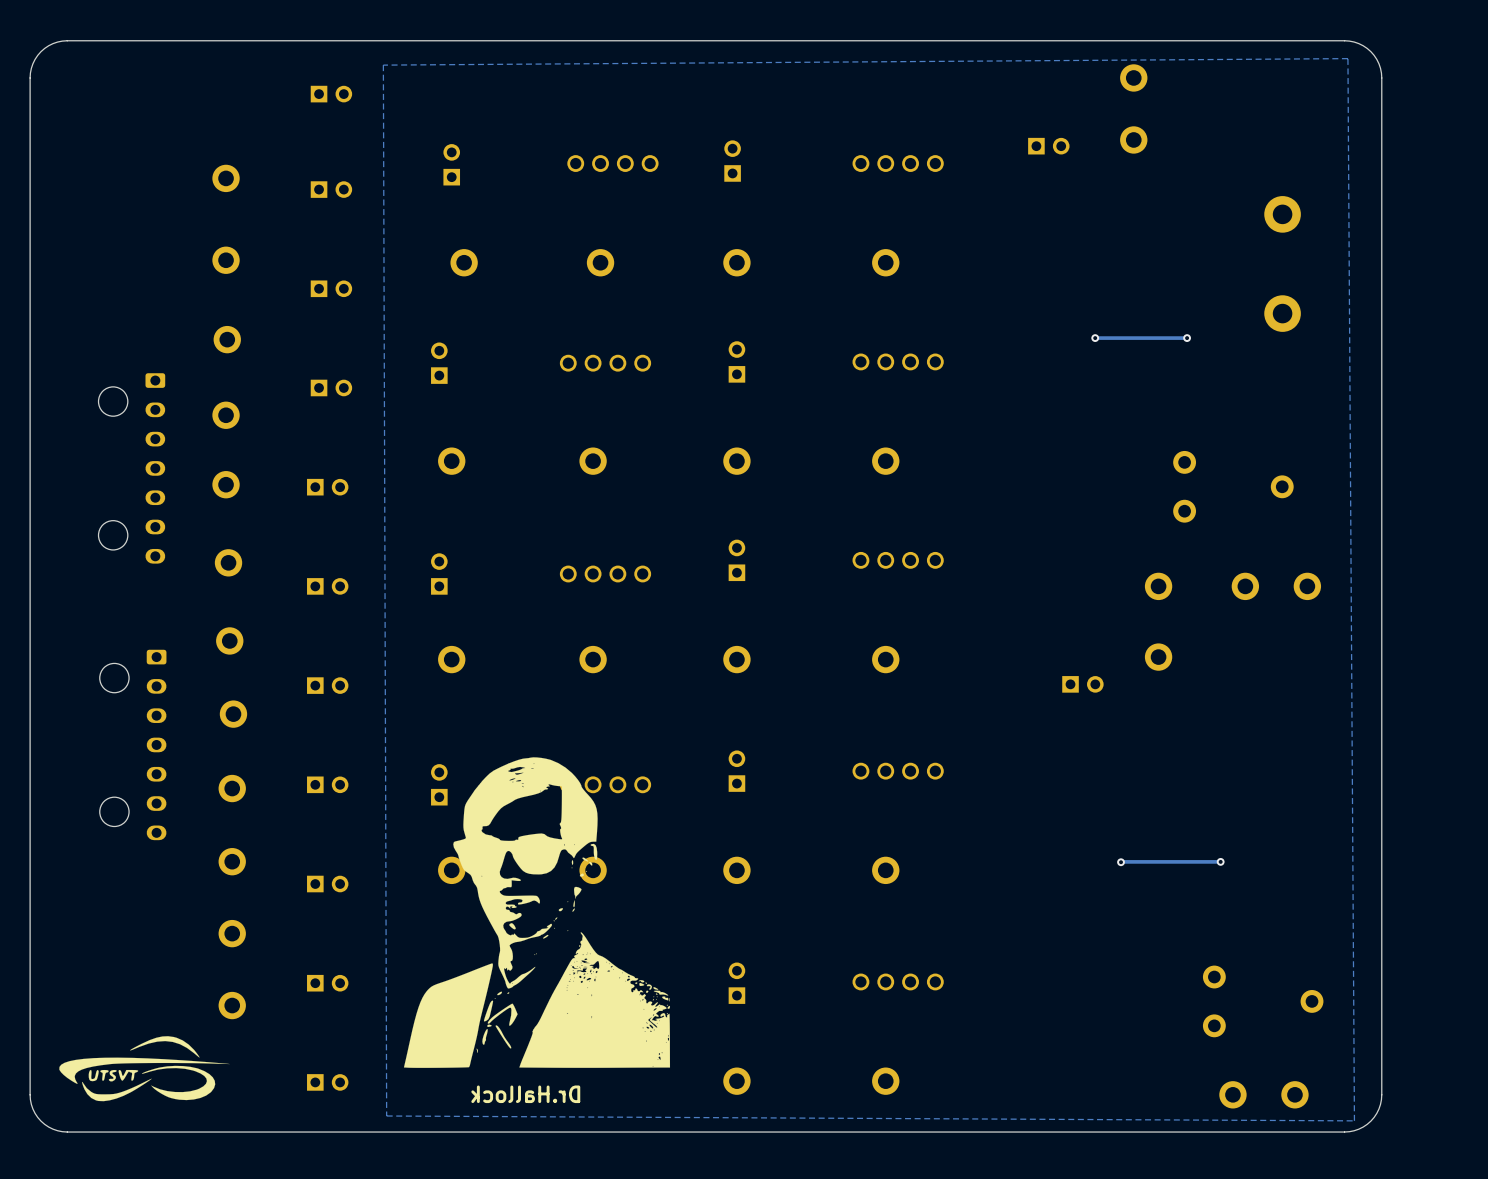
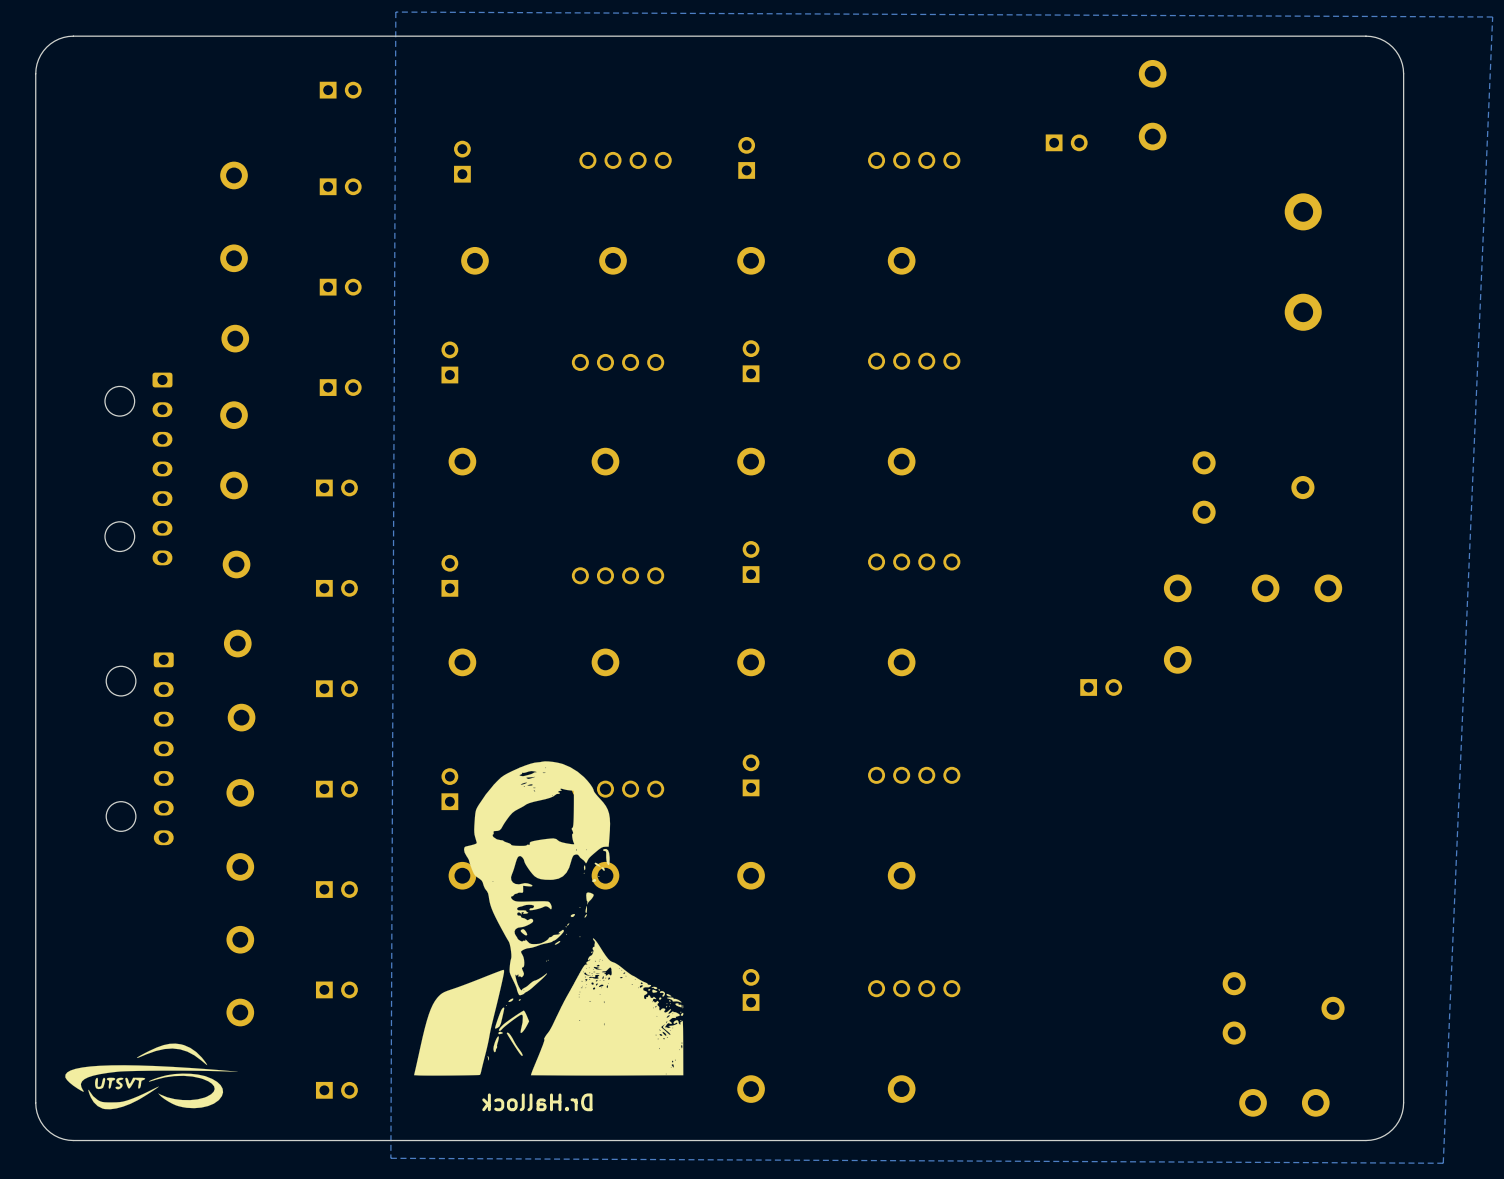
zone outline: (1347, 58) (1354, 1120) (386, 1116) (383, 65) (1347, 58) -> (395, 12) (1492, 17) (1443, 1163) (390, 1158) (395, 12)
via: (1095, 338) -> none
track: (1187, 338) (1095, 338) -> none
via: (1187, 338) -> none
track: (1220, 861) (1121, 862) -> none
via: (1220, 861) -> none
via: (1121, 862) -> none

